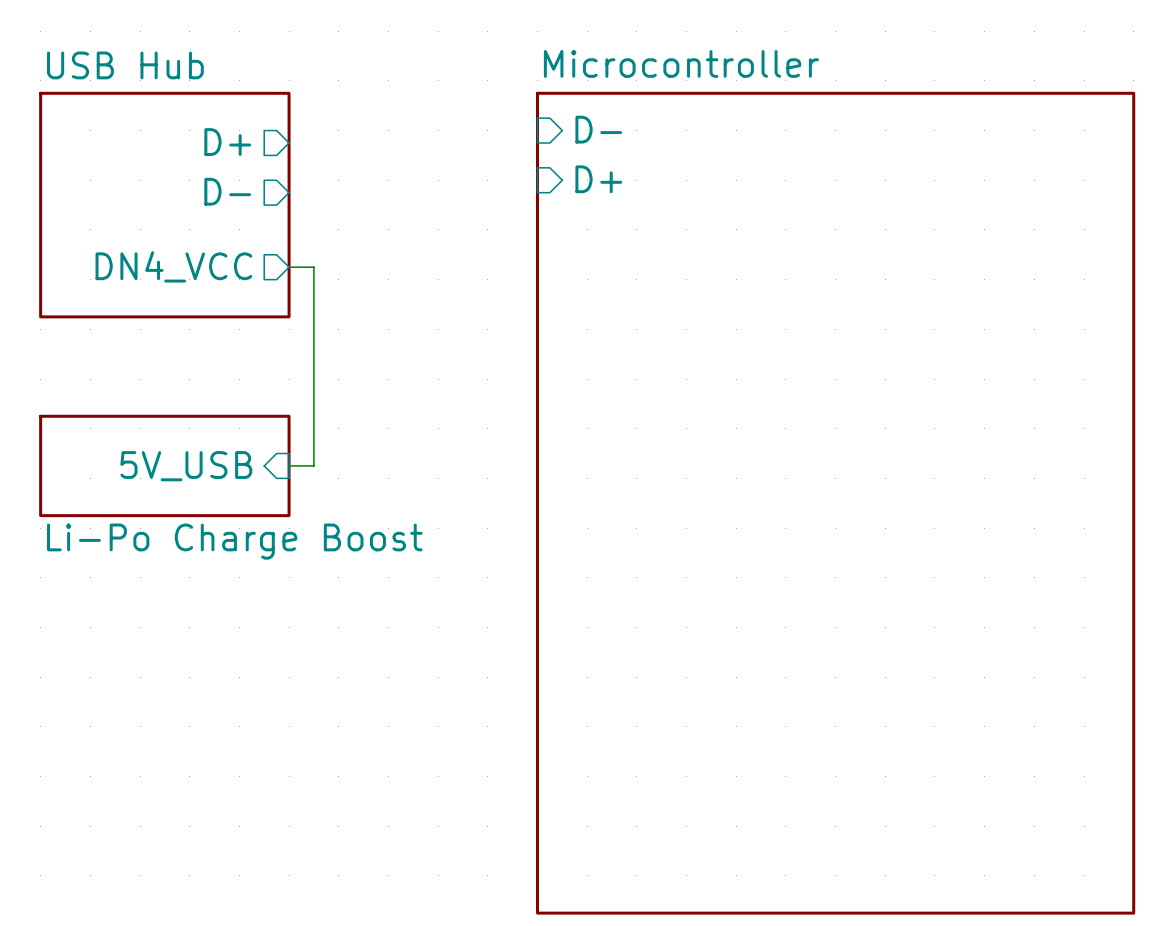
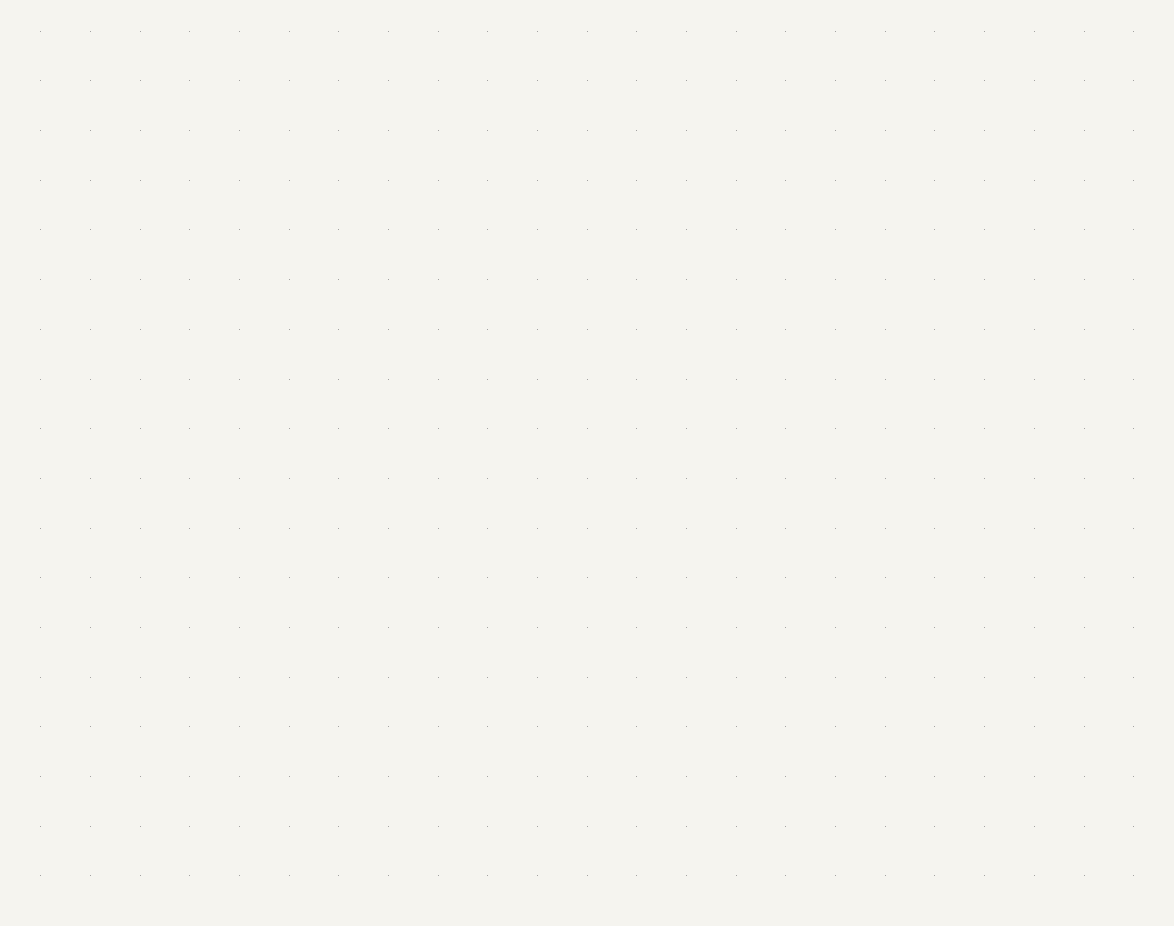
sheet pin: D- (598, 129) -> none
sheet pin: D+ (227, 142) -> none
sheet pin: D+ (598, 179) -> none
sheet pin: D- (227, 191) -> none
sheet USB Hub: (164, 205) -> none
sheet pin: DN4_VCC (173, 266) -> none
wire: (289, 267) (313, 267) (313, 465) (289, 465) -> none
sheet Li-Po Charge Boost: (164, 465) -> none
sheet pin: 5V_USB (186, 466) -> none
sheet Microcontroller: (835, 503) -> none

